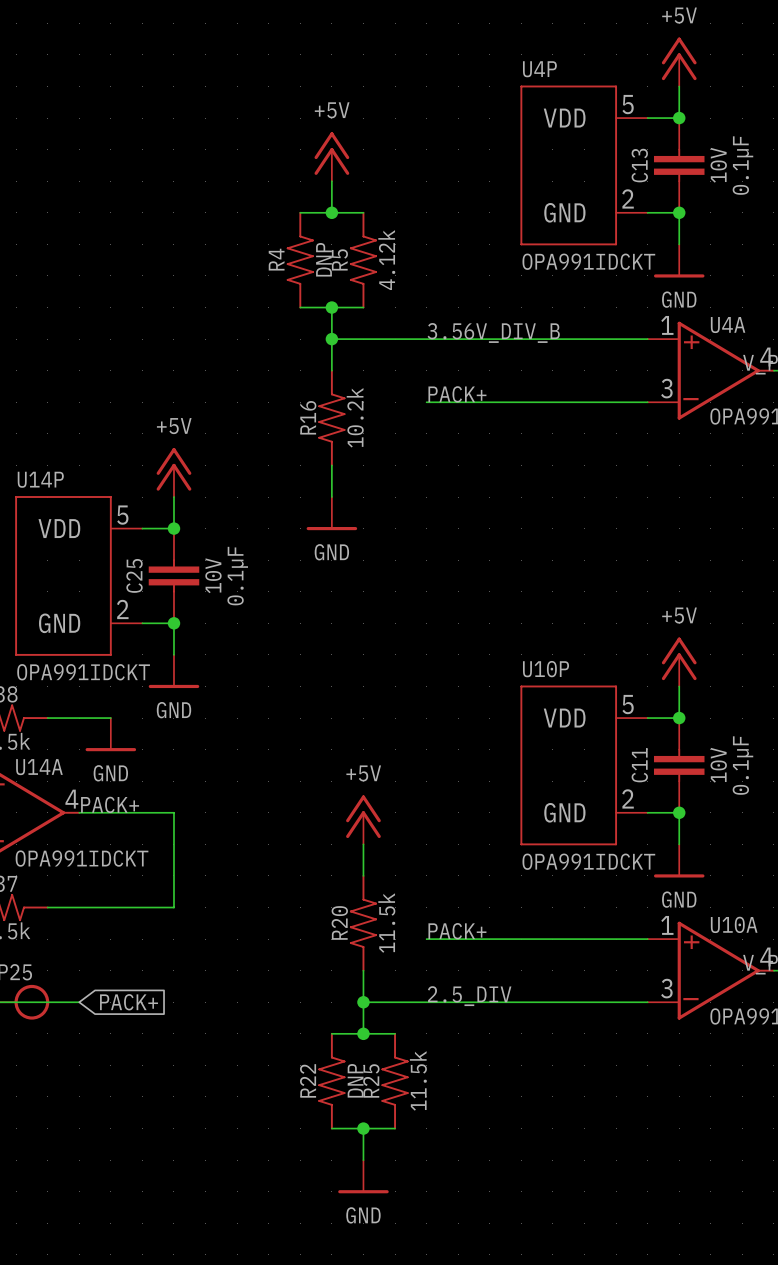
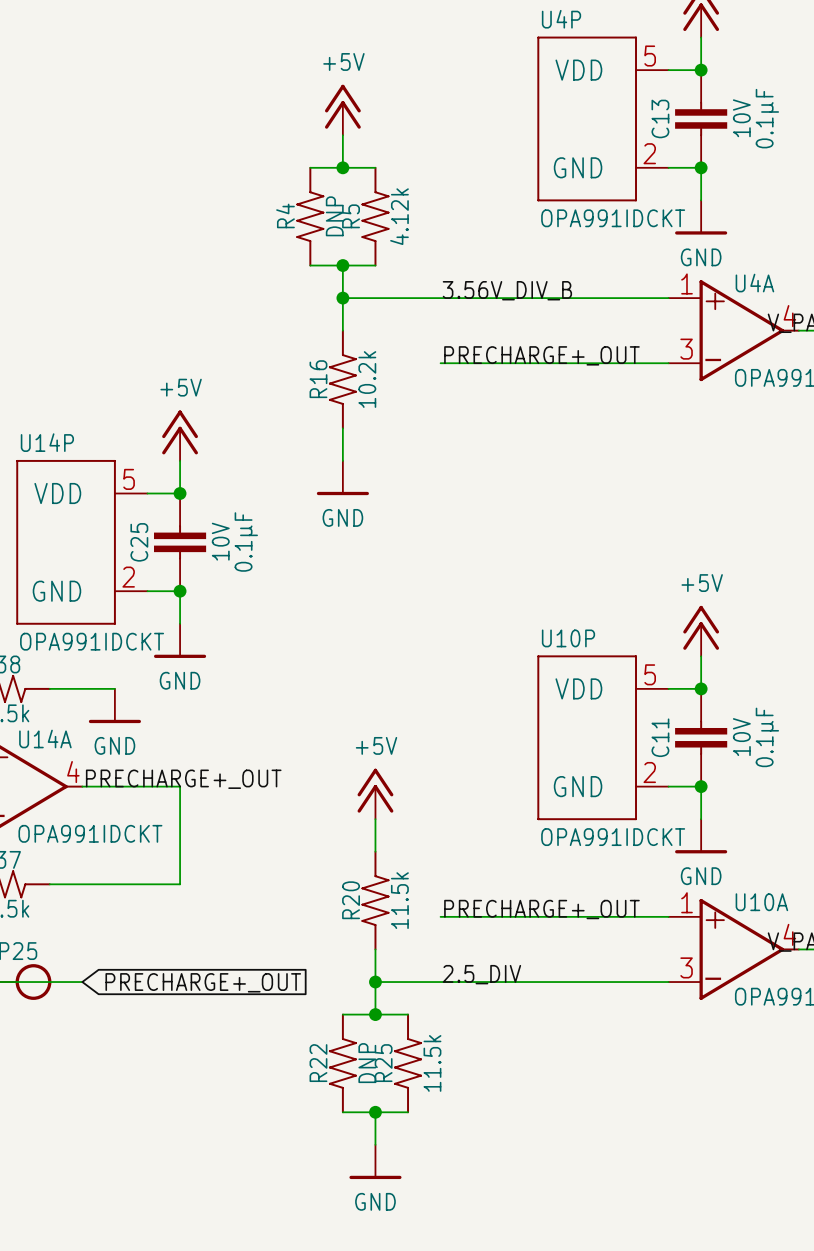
label: PACK+ (457, 394) -> PRECHARGE+_OUT (541, 355)
label: PACK+ (110, 804) -> PRECHARGE+_OUT (183, 779)
label: PACK+ (457, 931) -> PRECHARGE+_OUT (541, 909)
global label: PACK+ (129, 1002) -> PRECHARGE+_OUT (203, 982)

